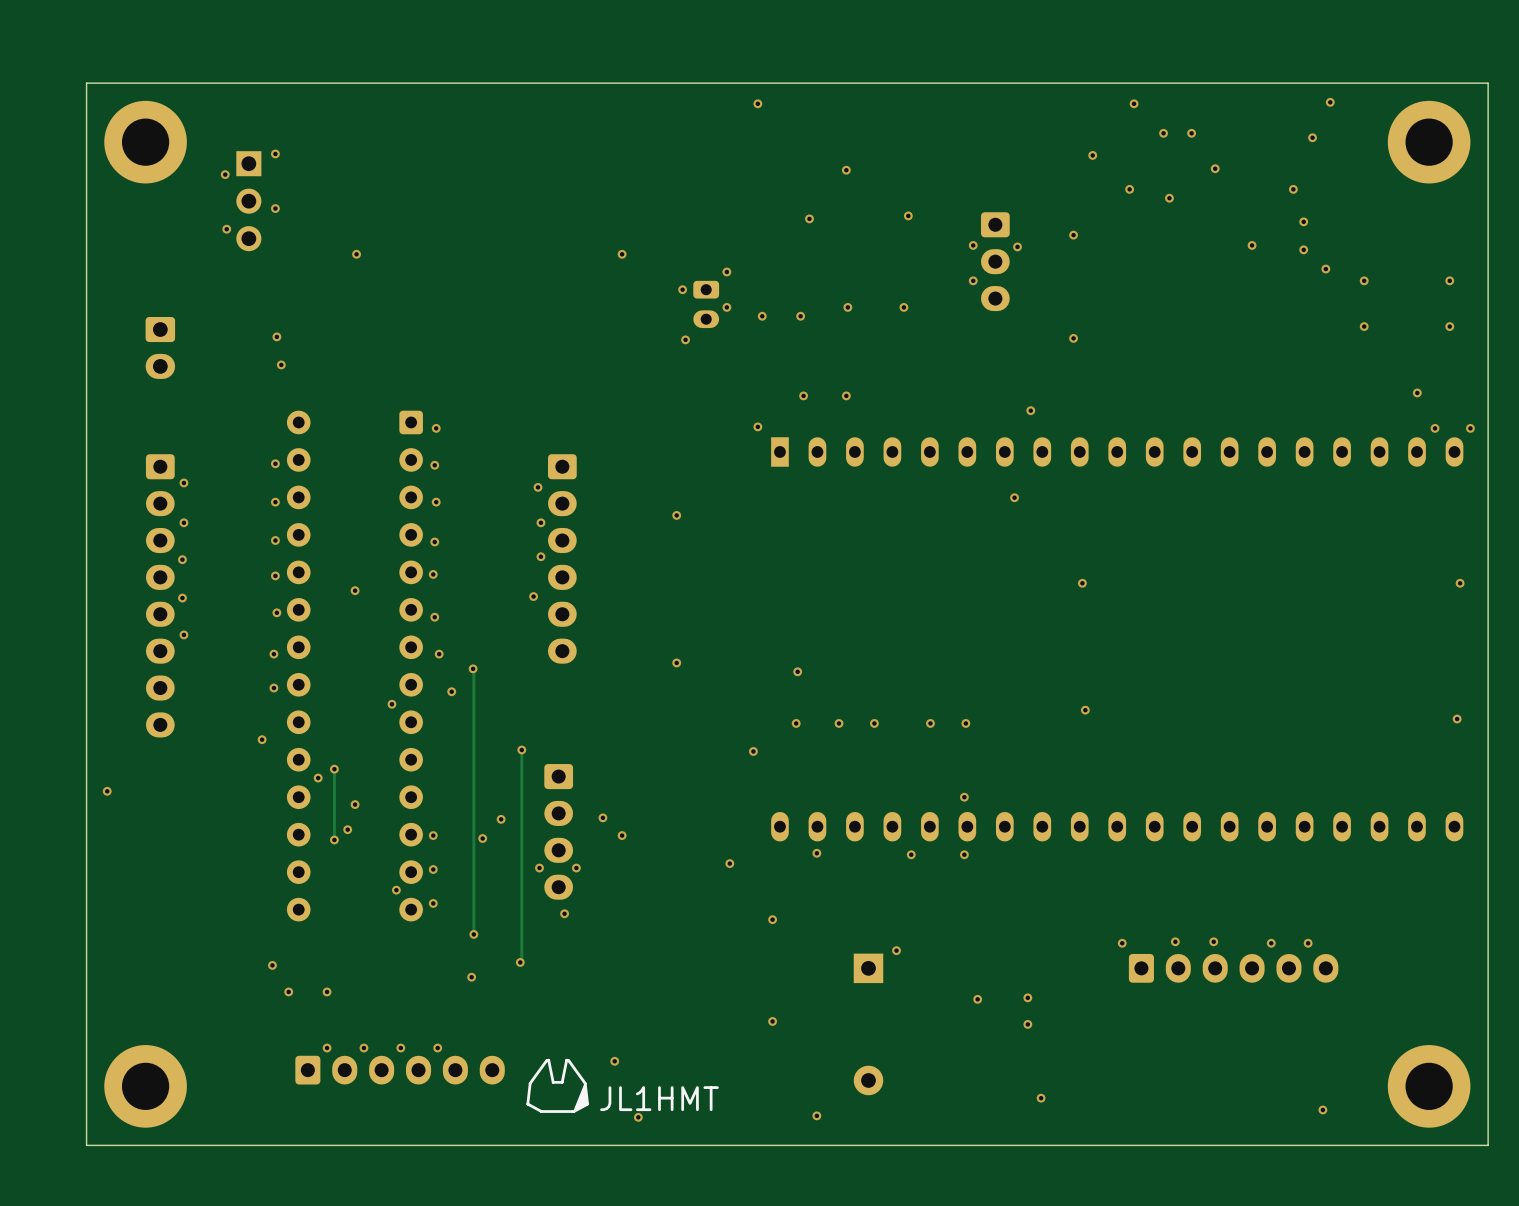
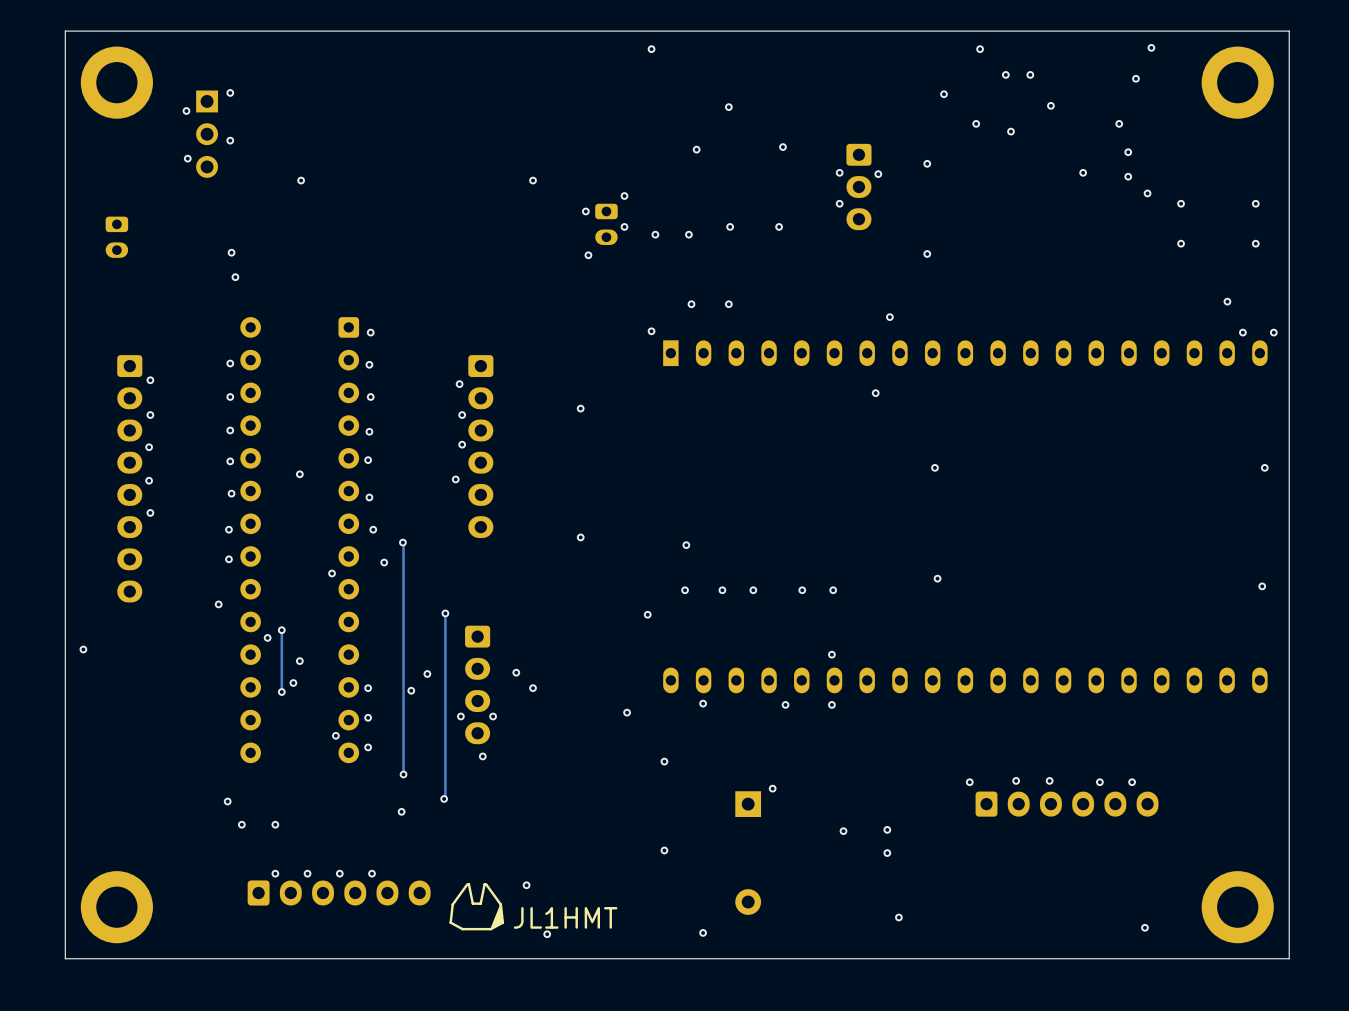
part: none -> (116, 237)
part: (160, 347) -> none

